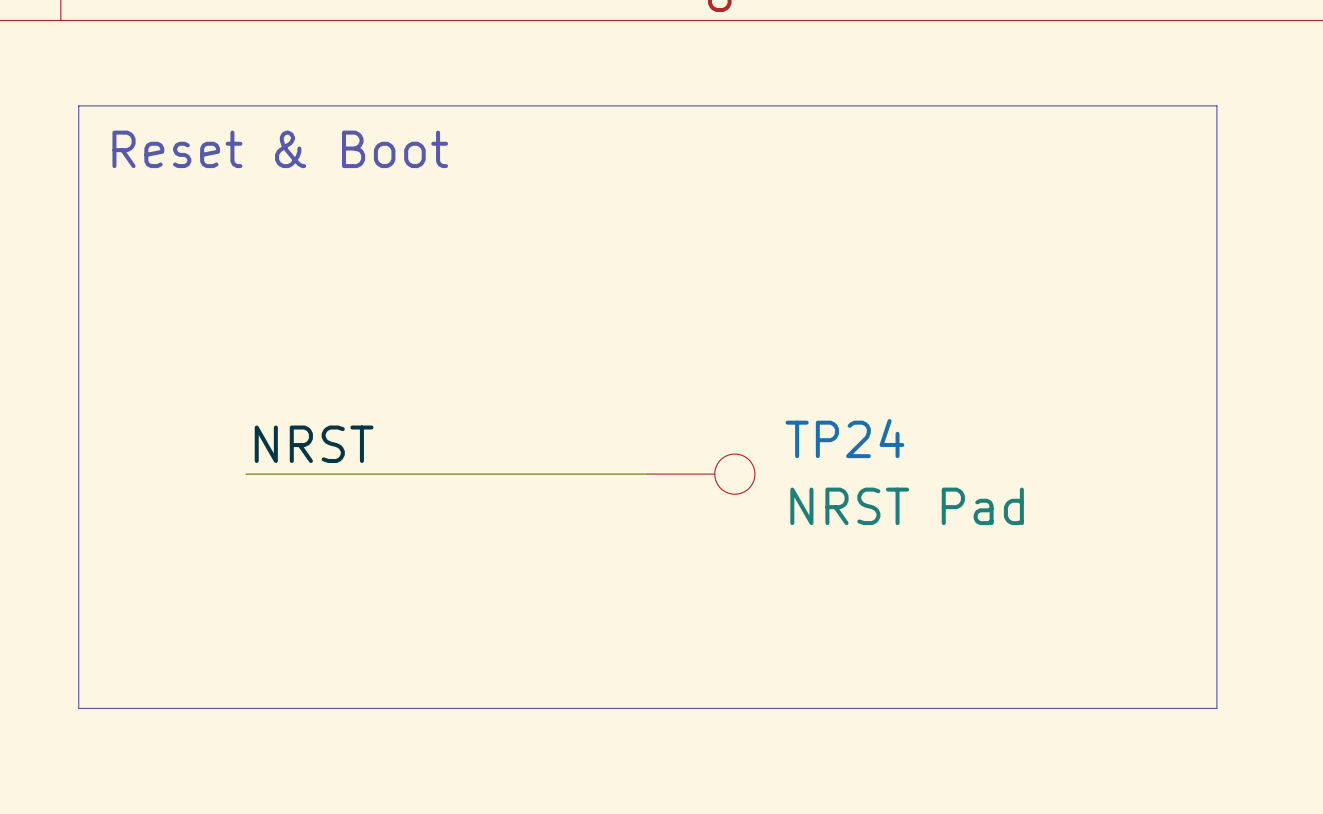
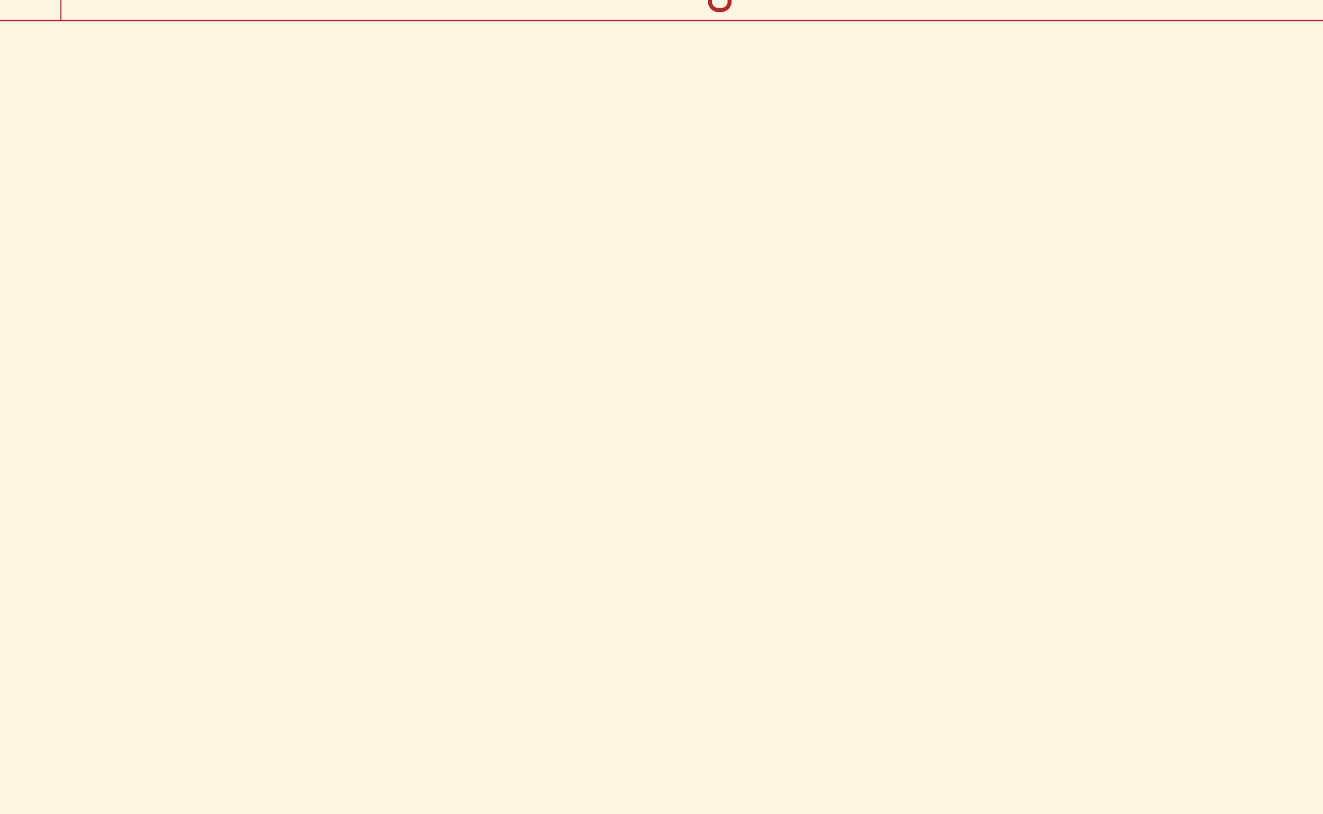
line: (78, 105) (1216, 105) (1216, 708) (78, 708) (78, 105) -> none
text: Reset & Boot (280, 149) -> none
label: NRST (314, 444) -> none
wire: (246, 474) (647, 474) -> none
TP24: NRST Pad (701, 474) -> none

